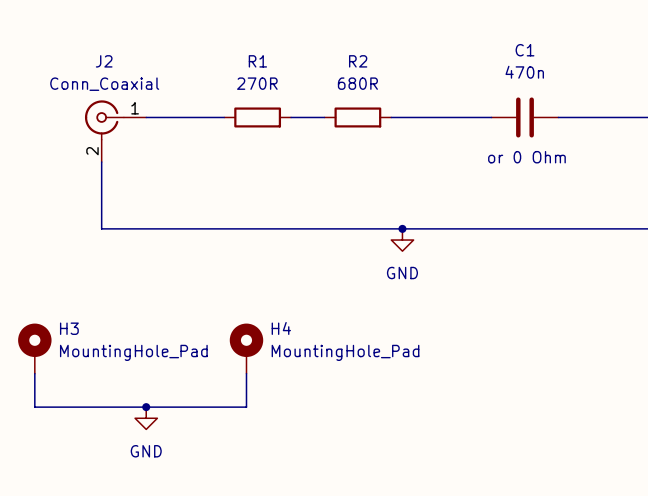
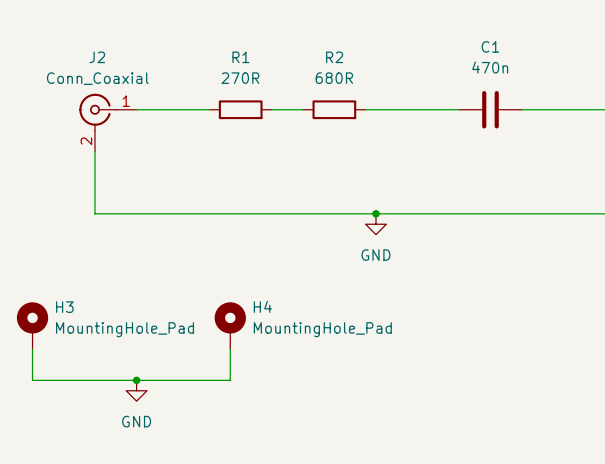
text: or 0 Ohm (526, 157) -> none

